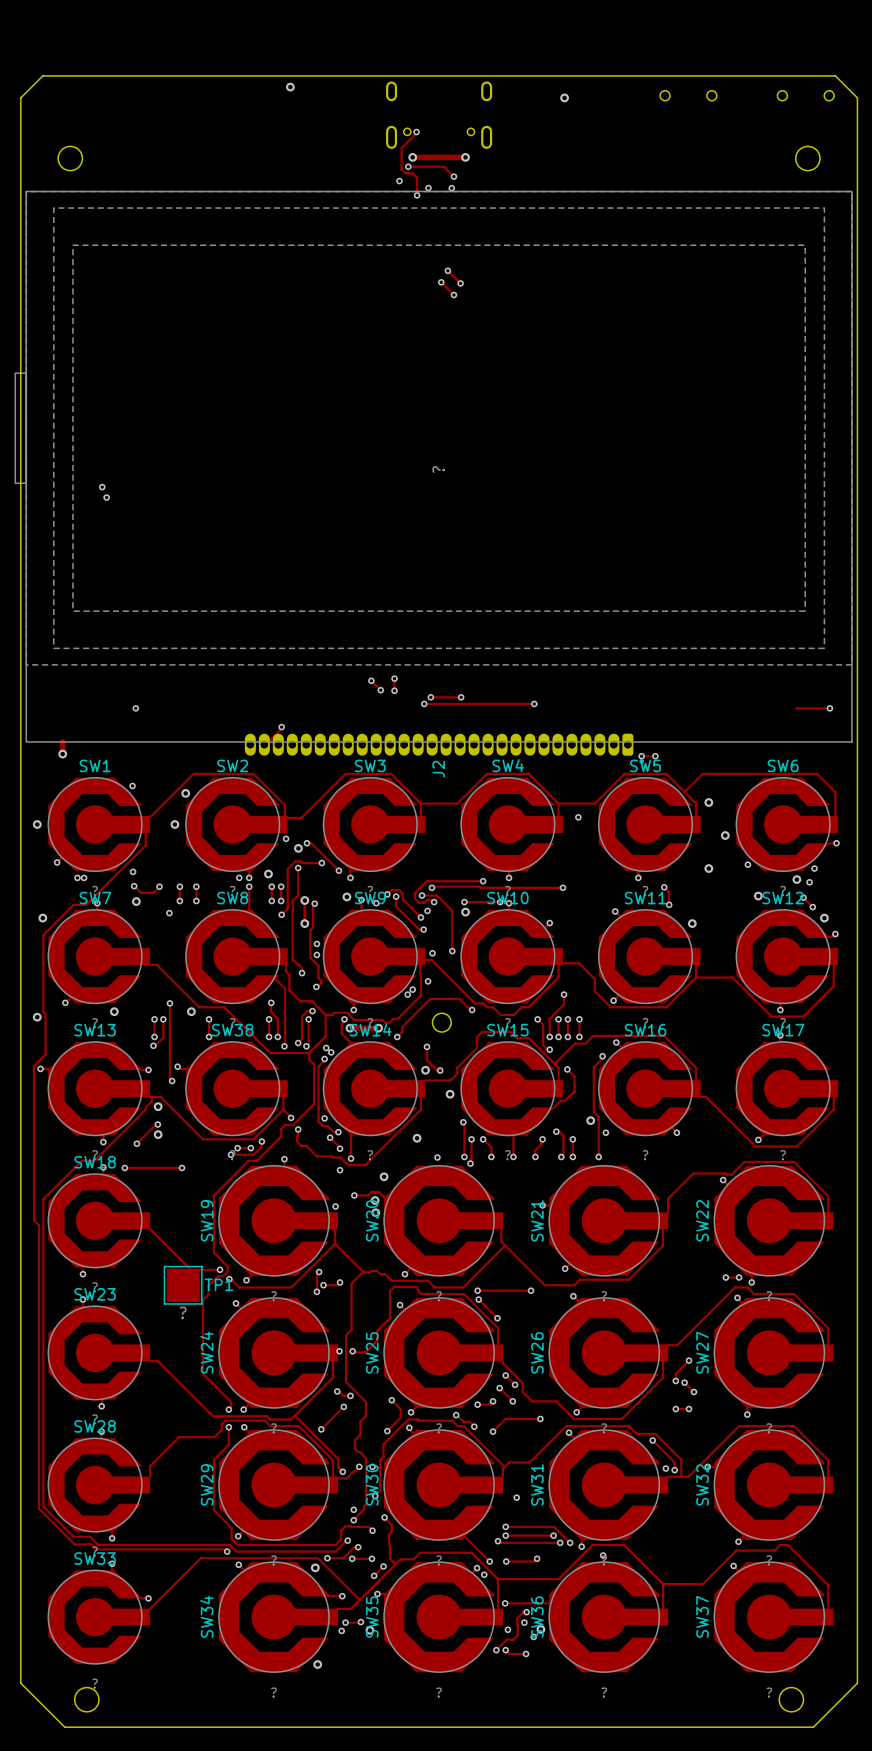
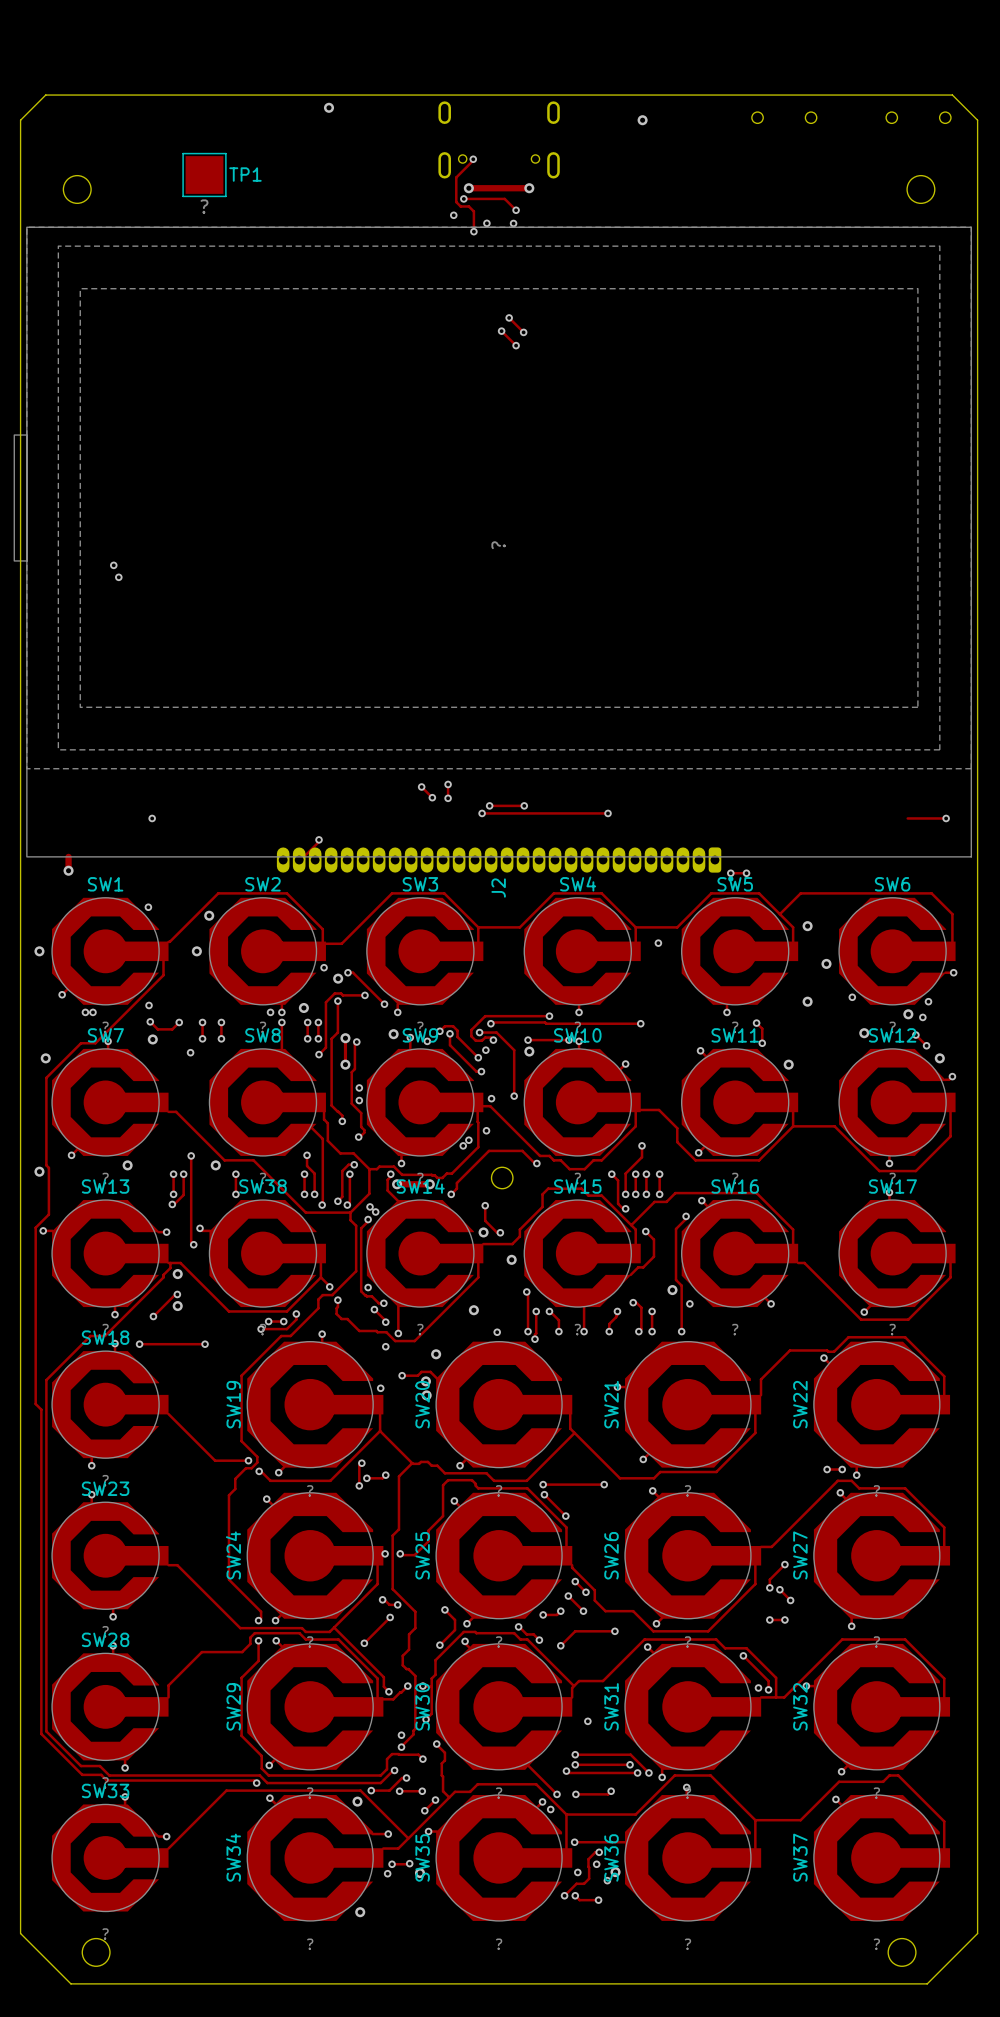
TP1 position: (183, 1285) -> (204, 175)

